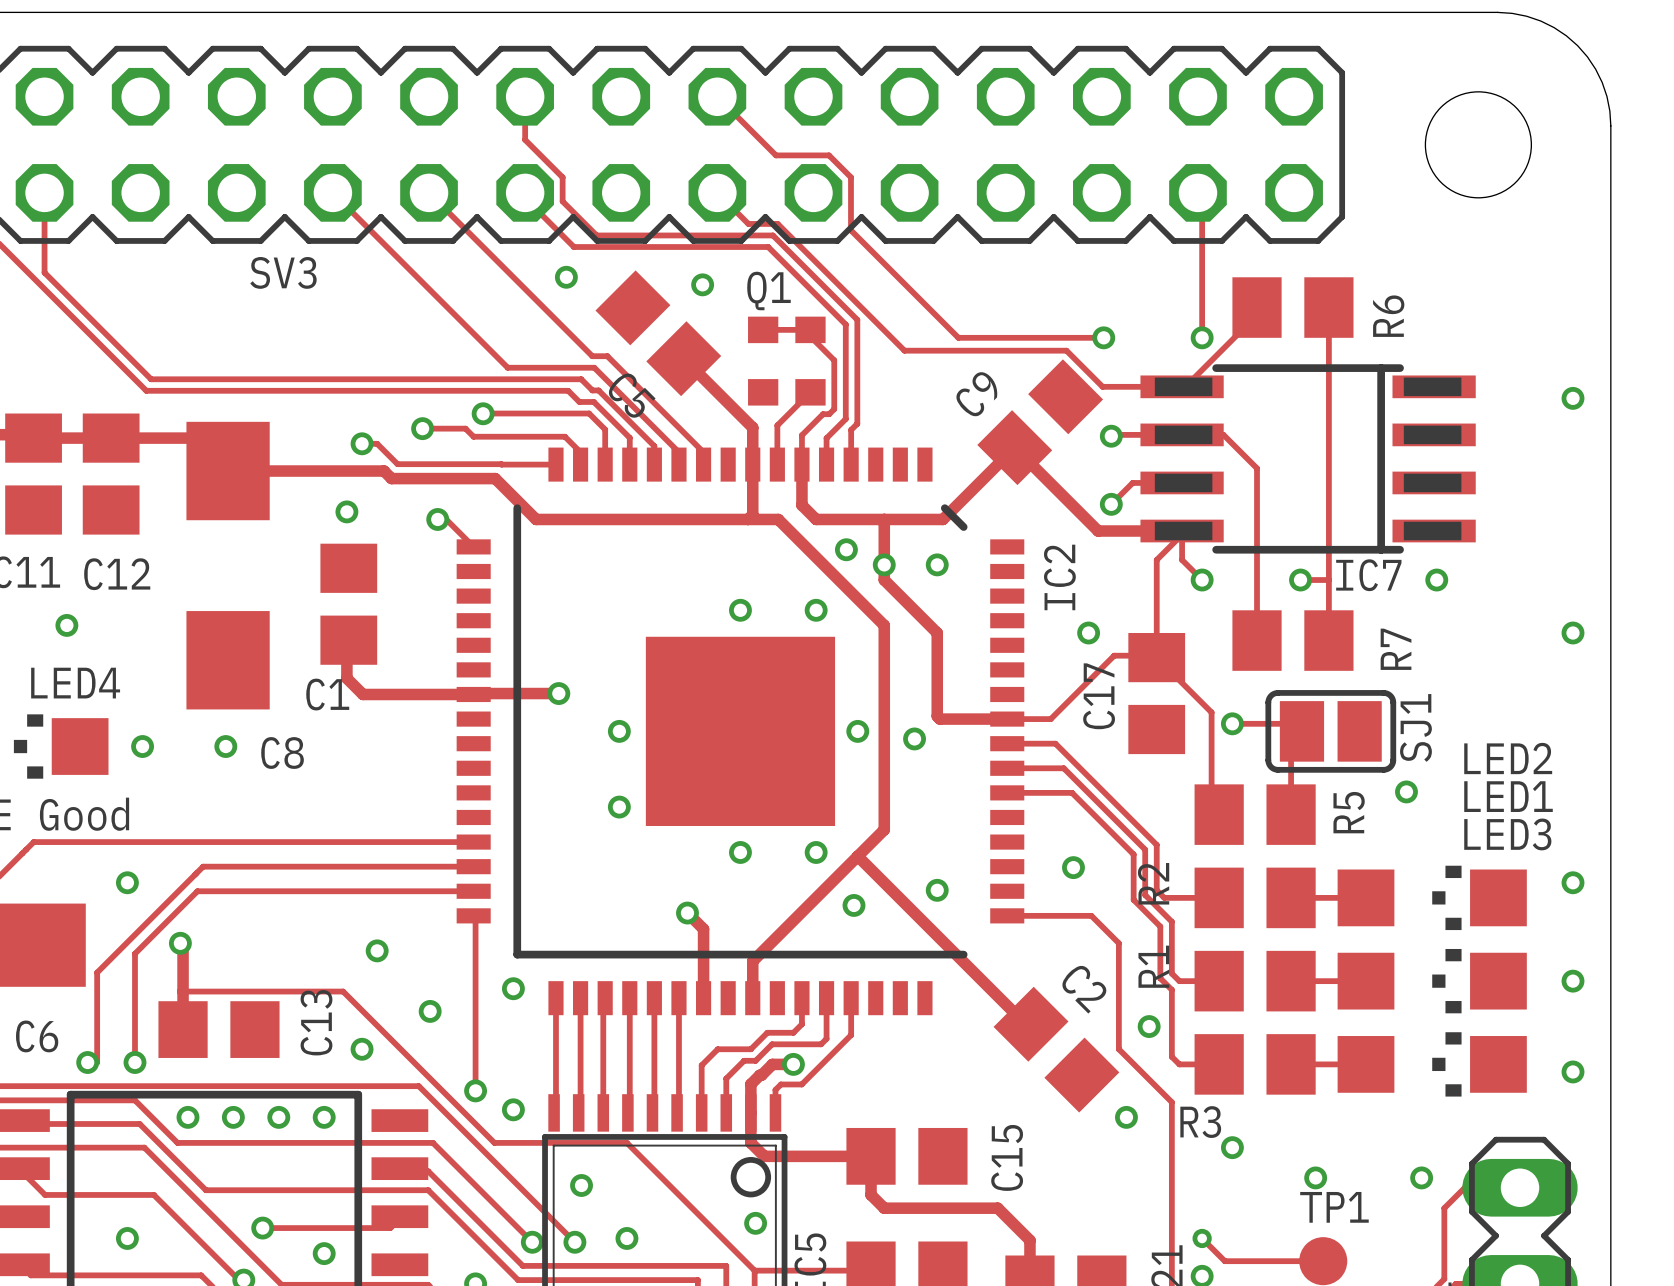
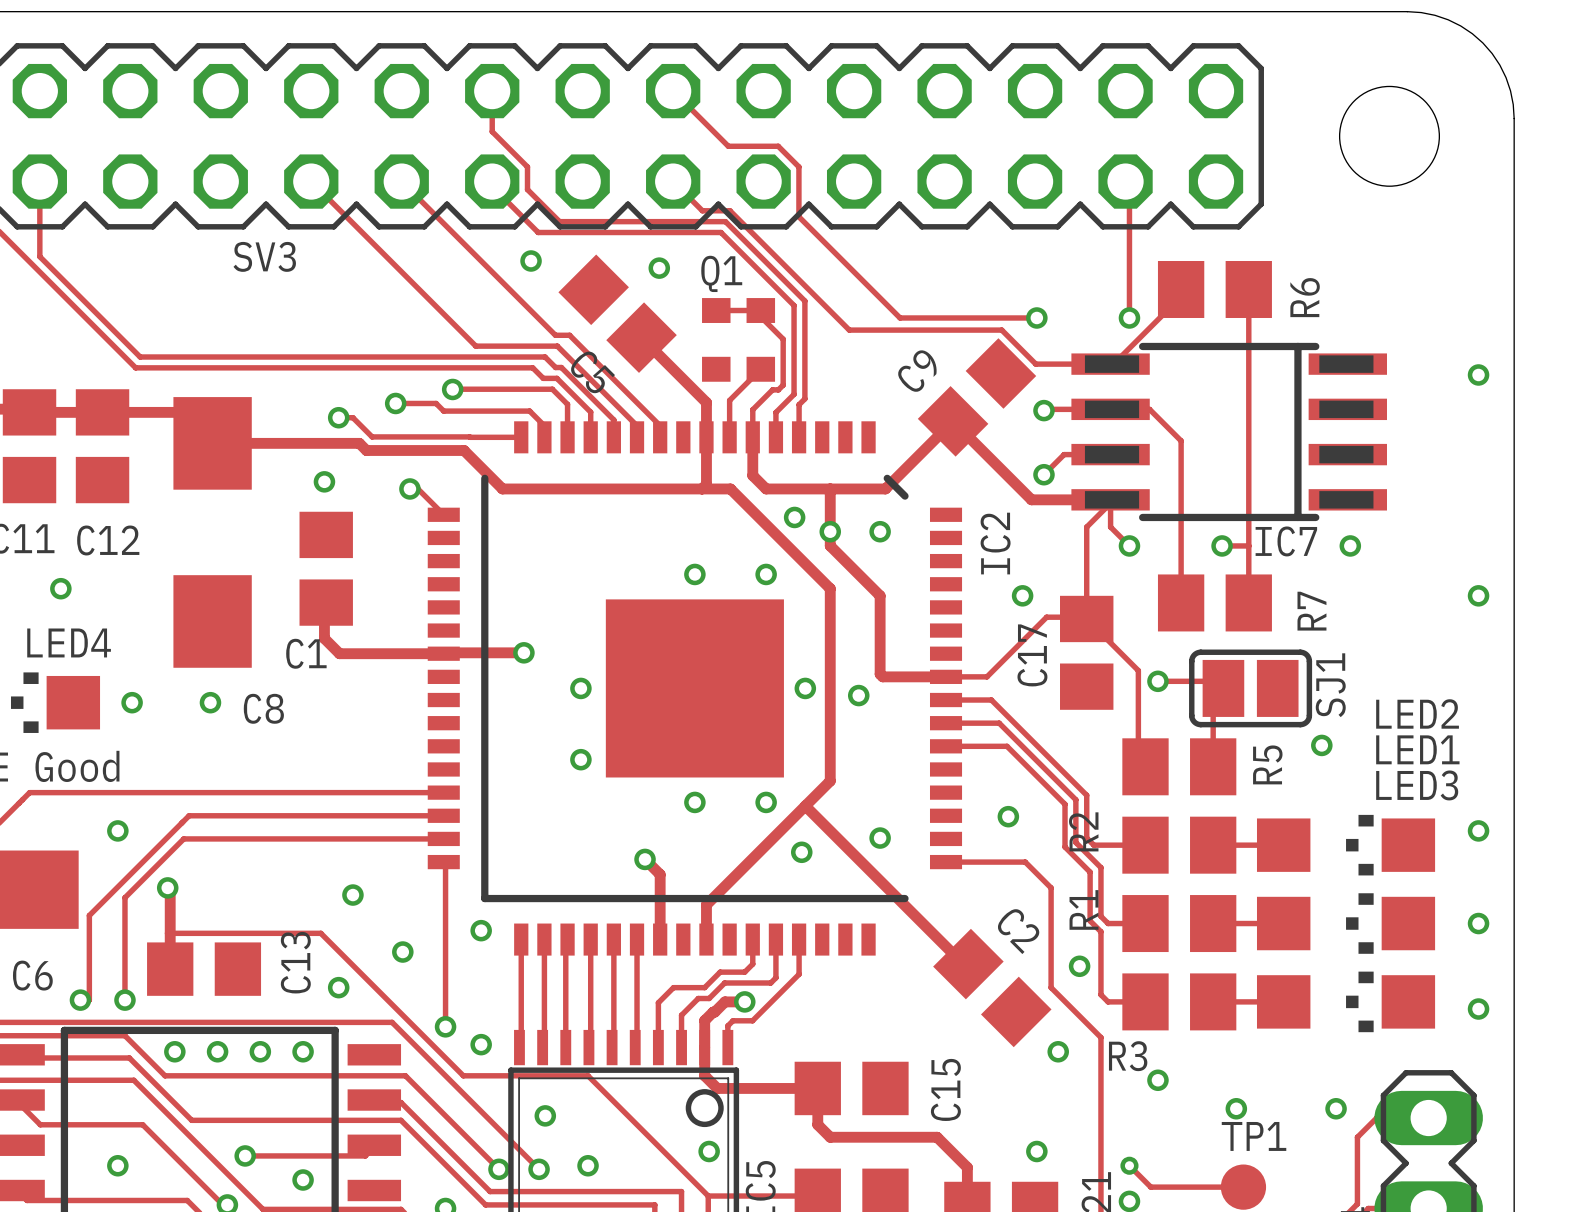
via: none -> (1036, 1151)

